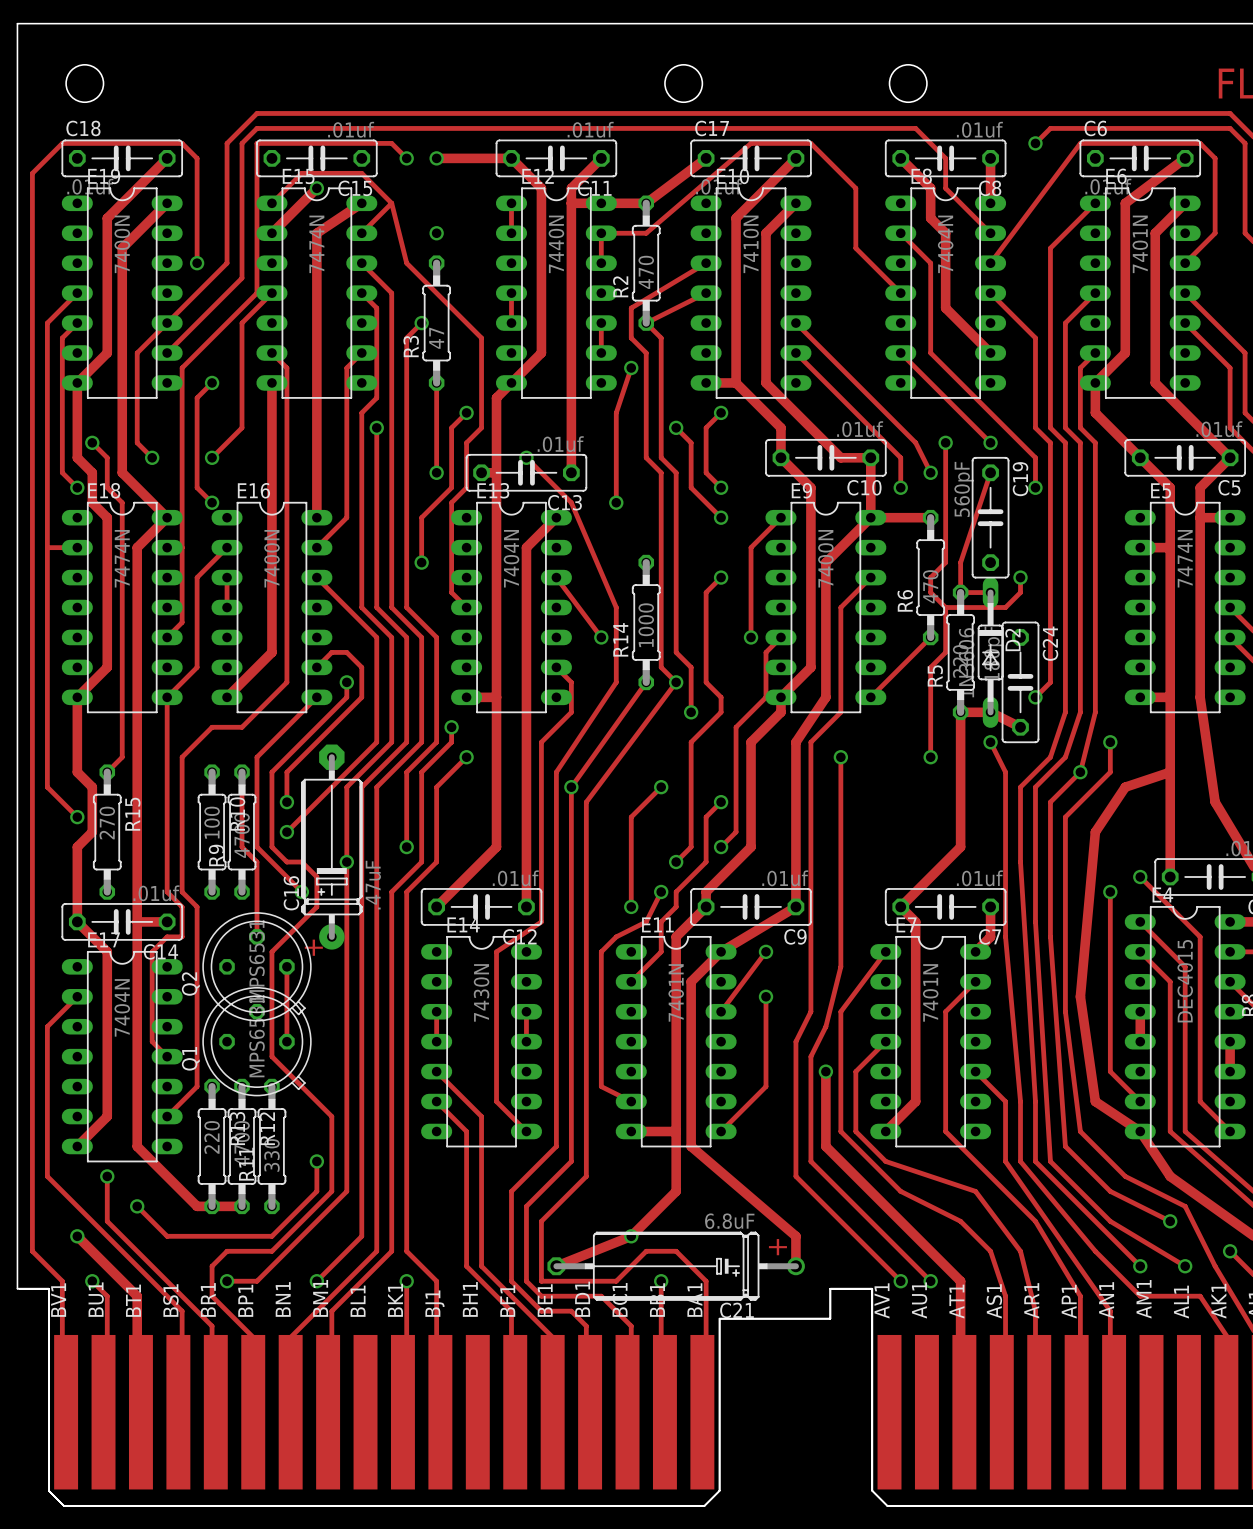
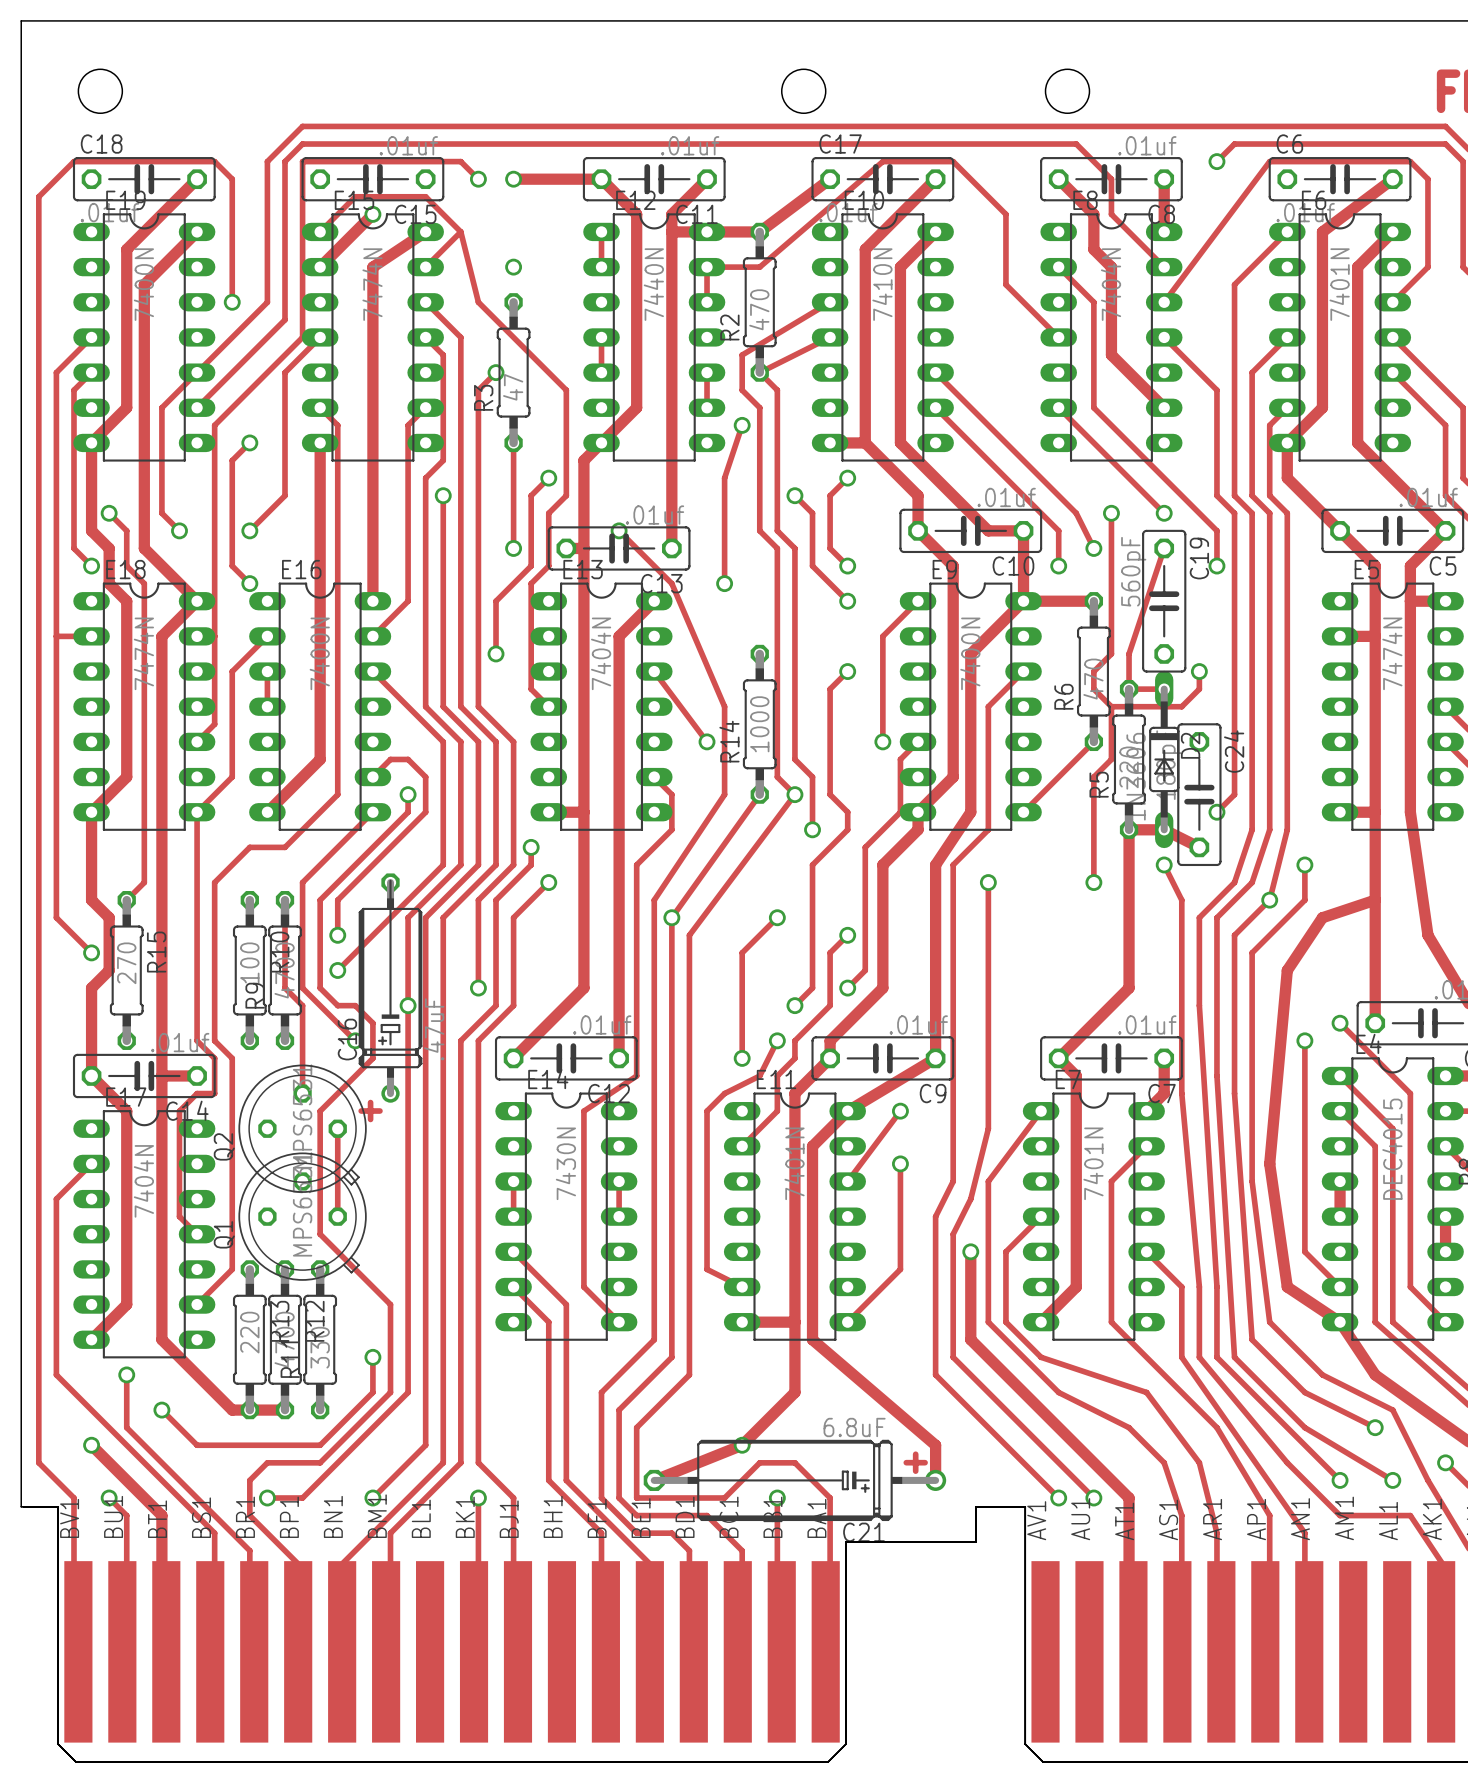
C16 footprint: [301, 744, 363, 950] -> [358, 873, 423, 1103]

